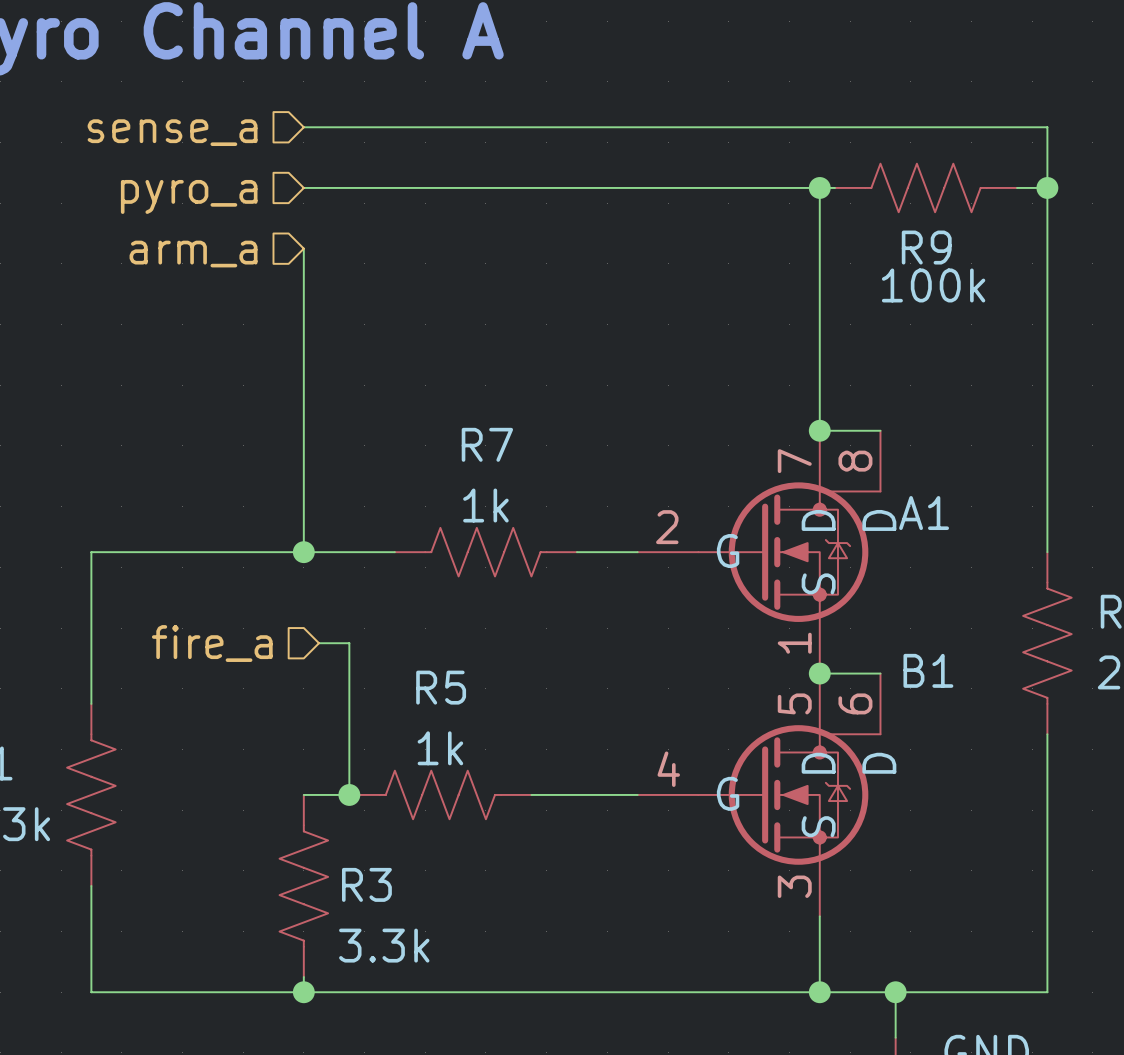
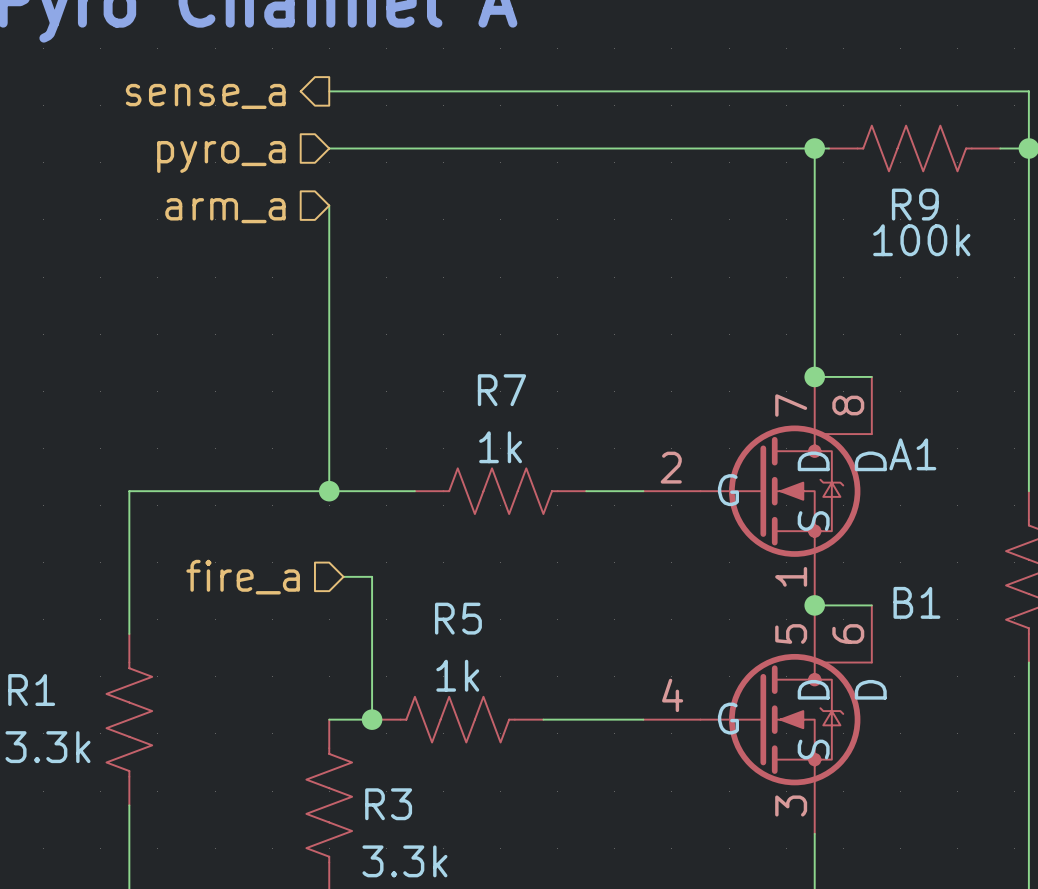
hierarchical label shape: input (172, 132) -> output (205, 96)

